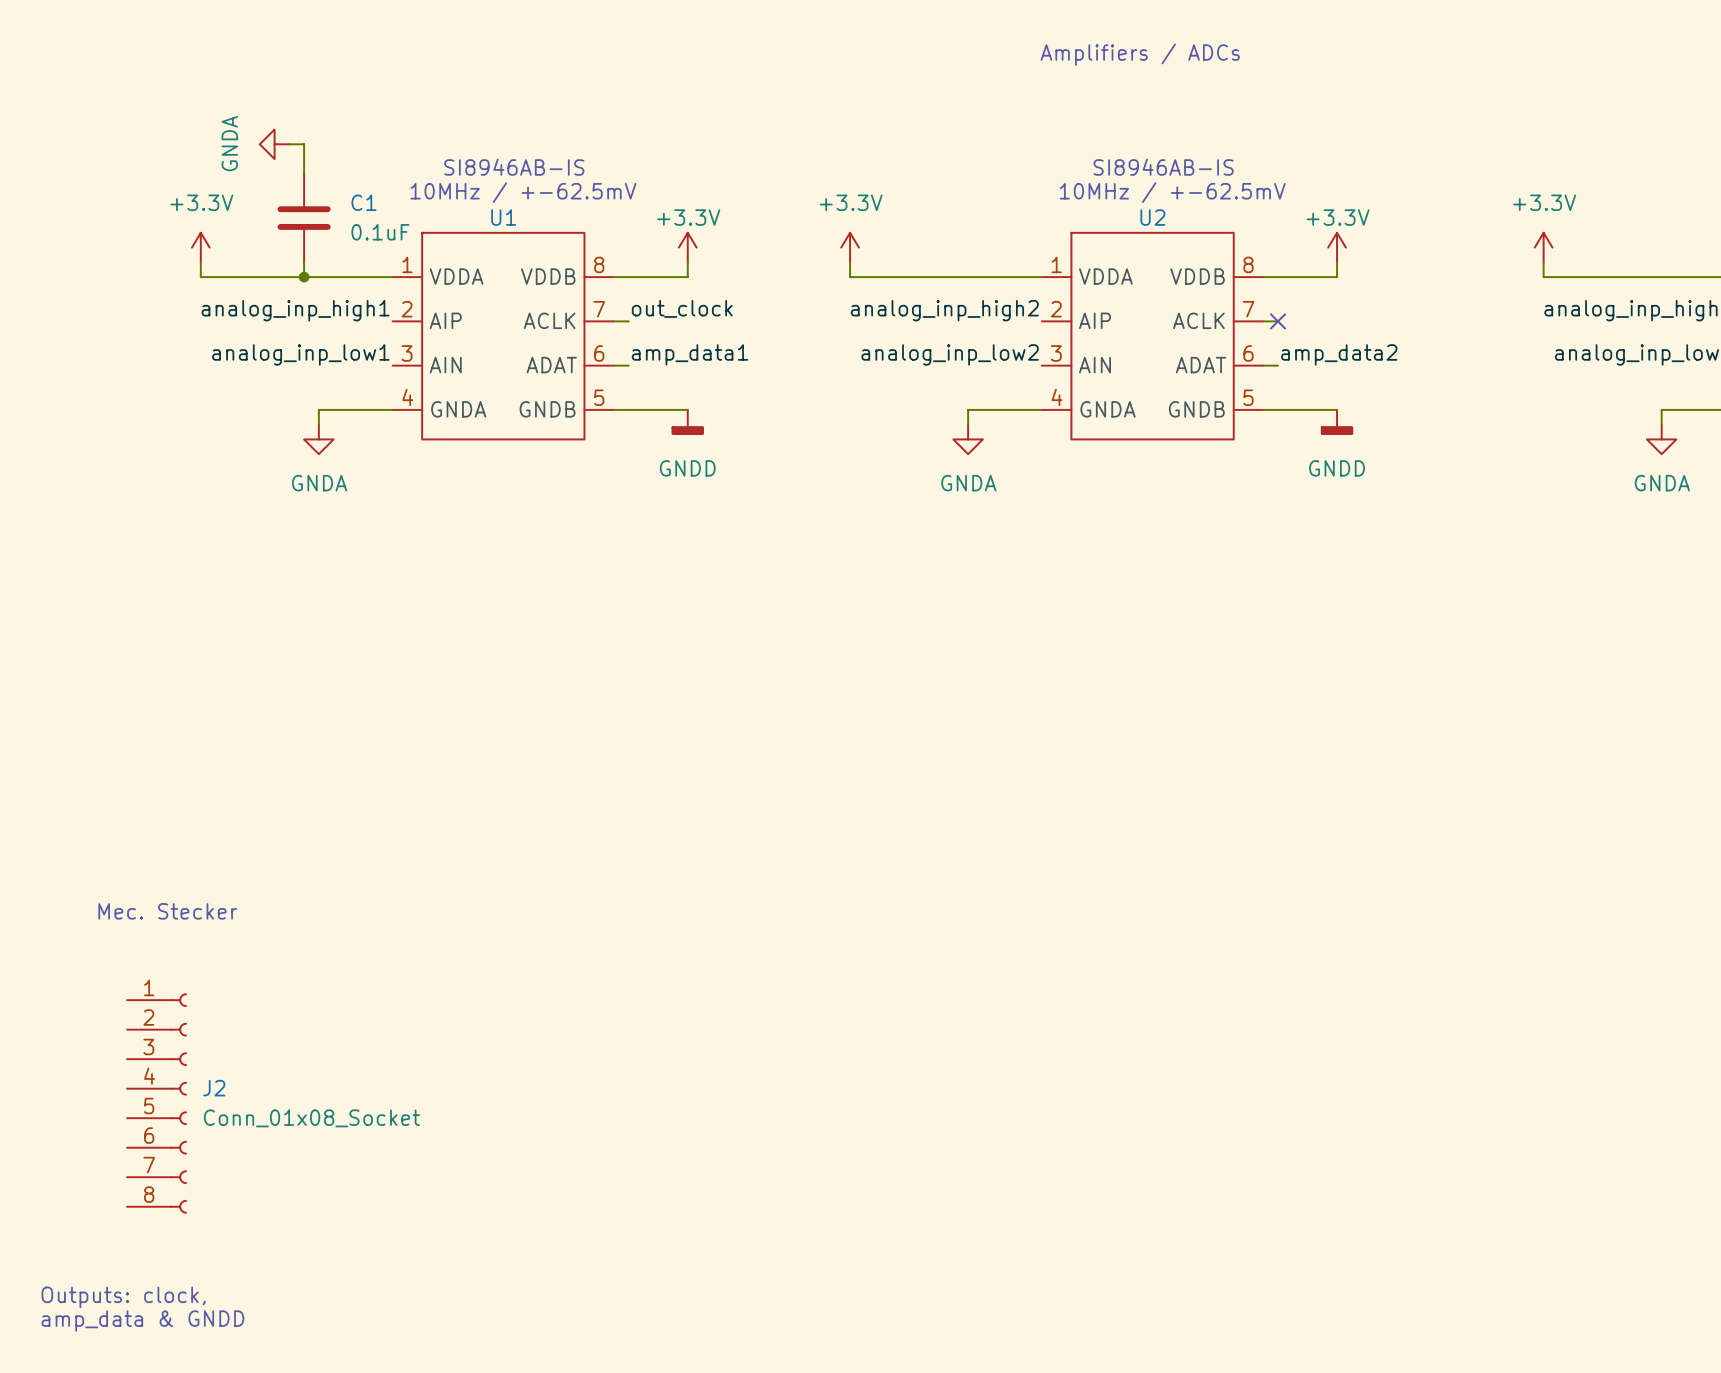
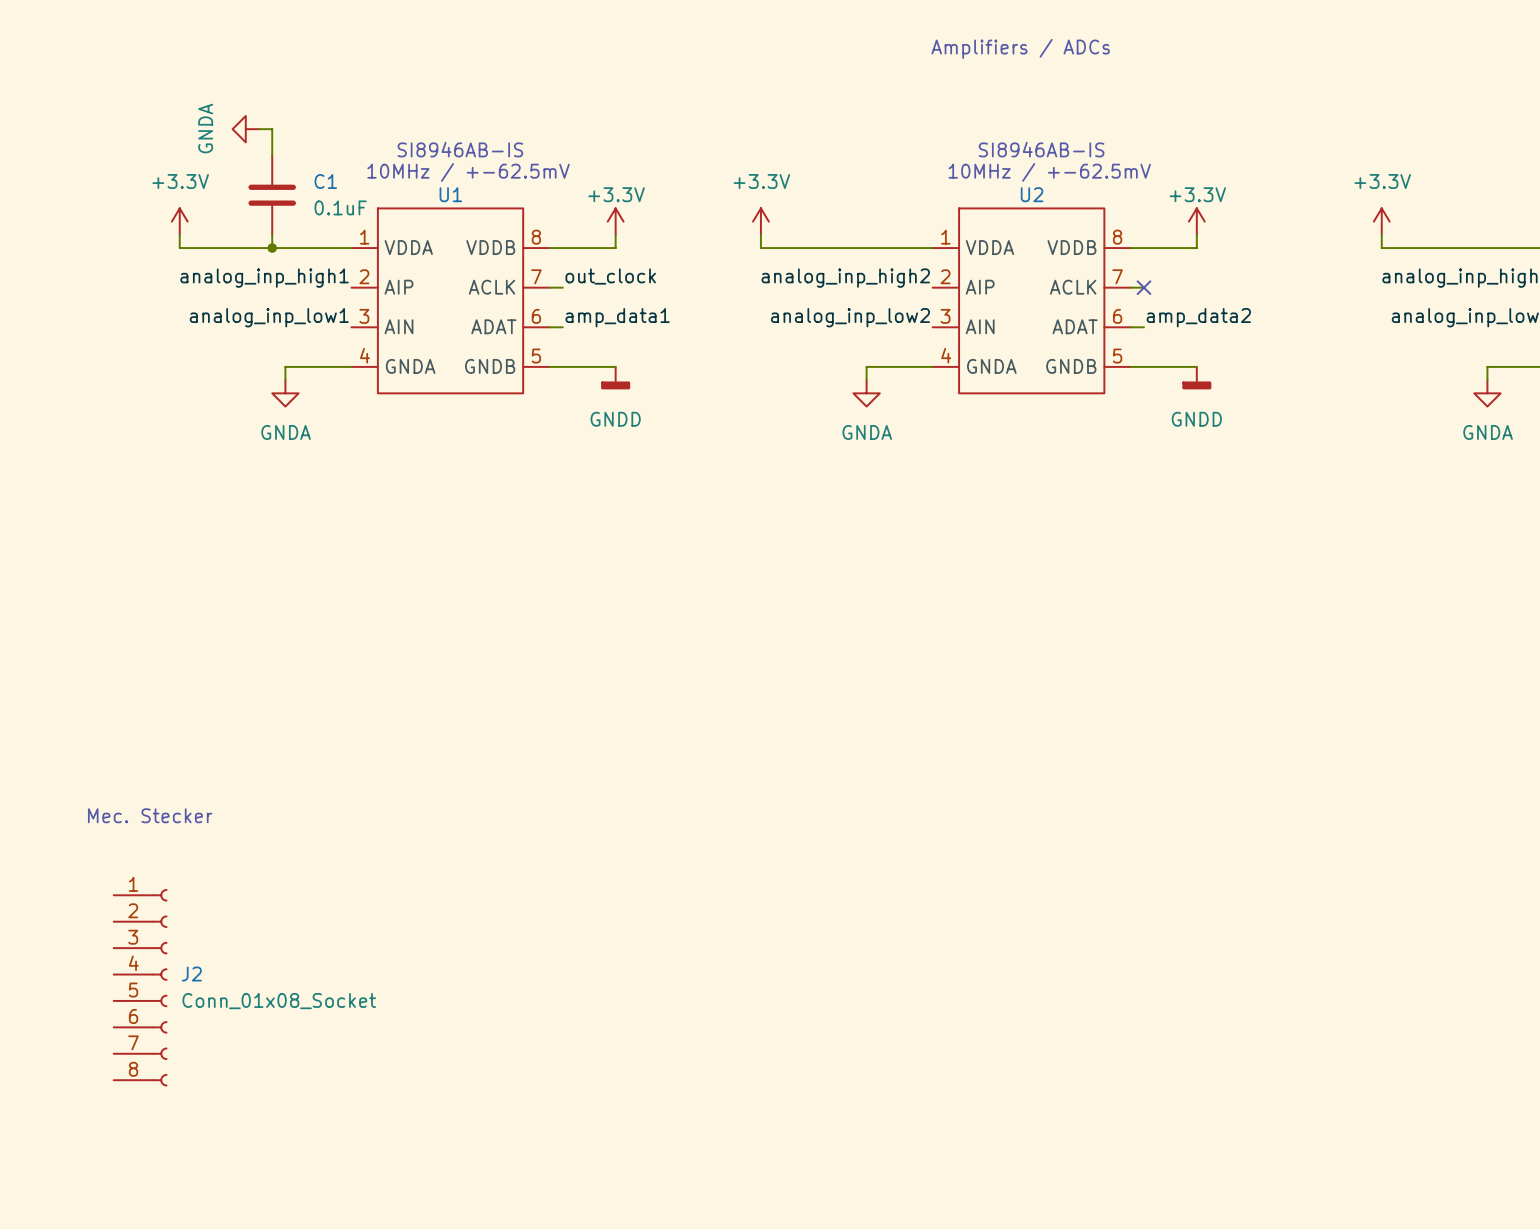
text: Outputs: clock, (123, 1297) -> none
text: amp_data & GNDD (142, 1321) -> none

